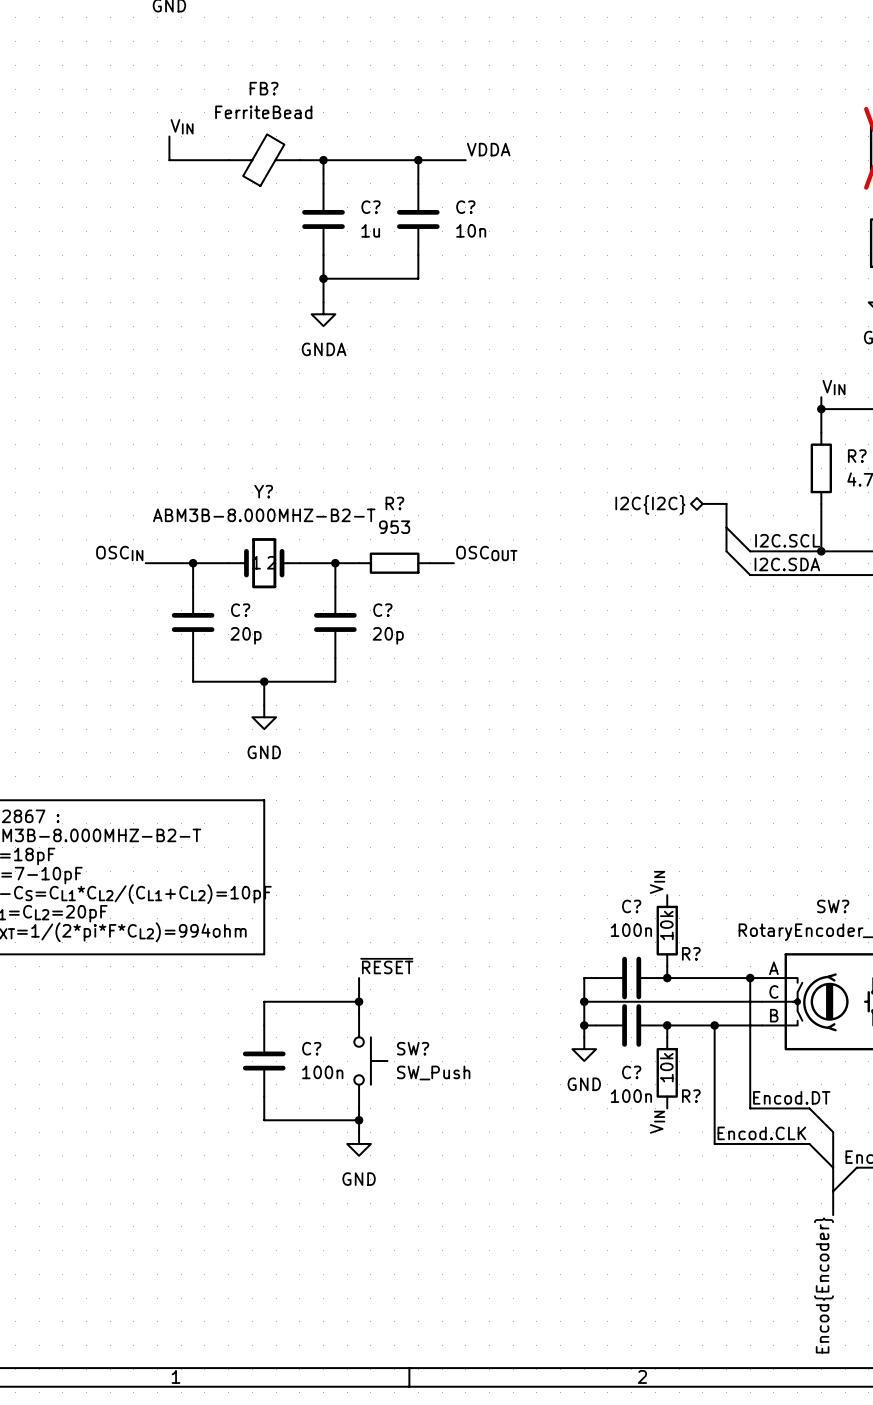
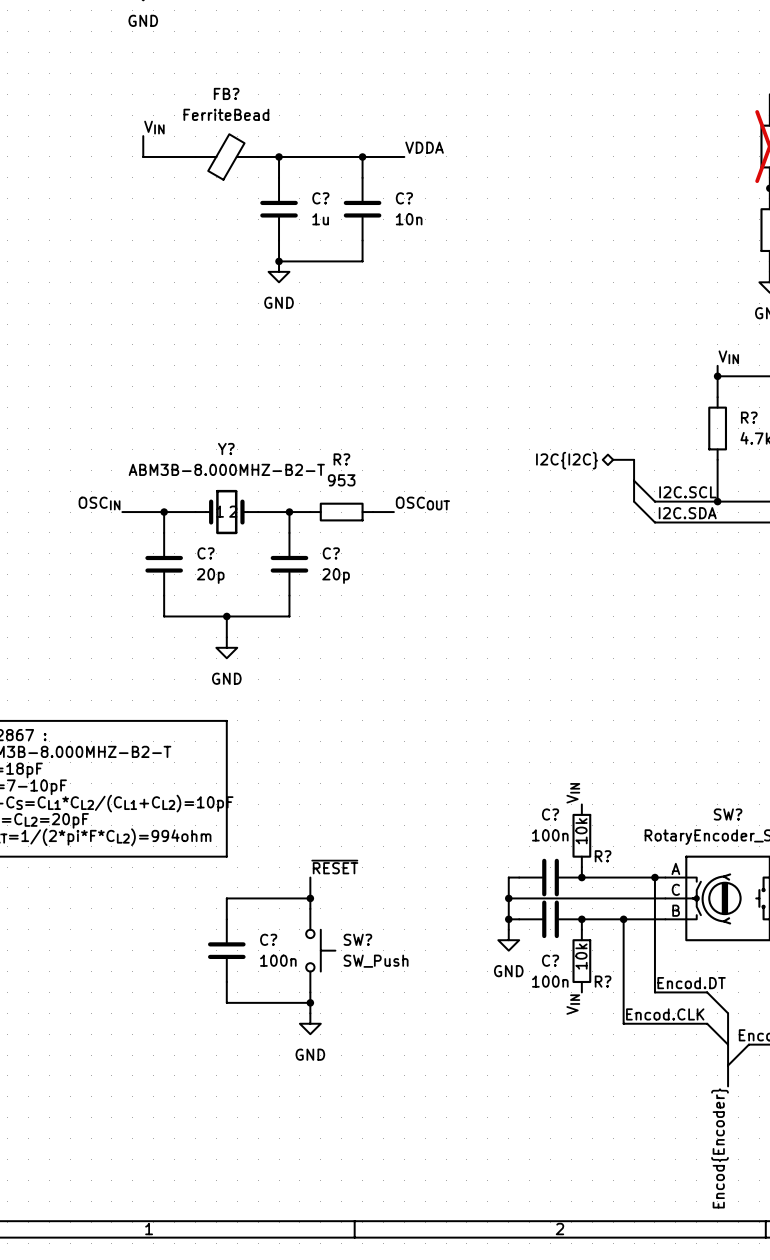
power symbol: none -> GND (279, 271)
power symbol: GNDA (323, 314) -> none

